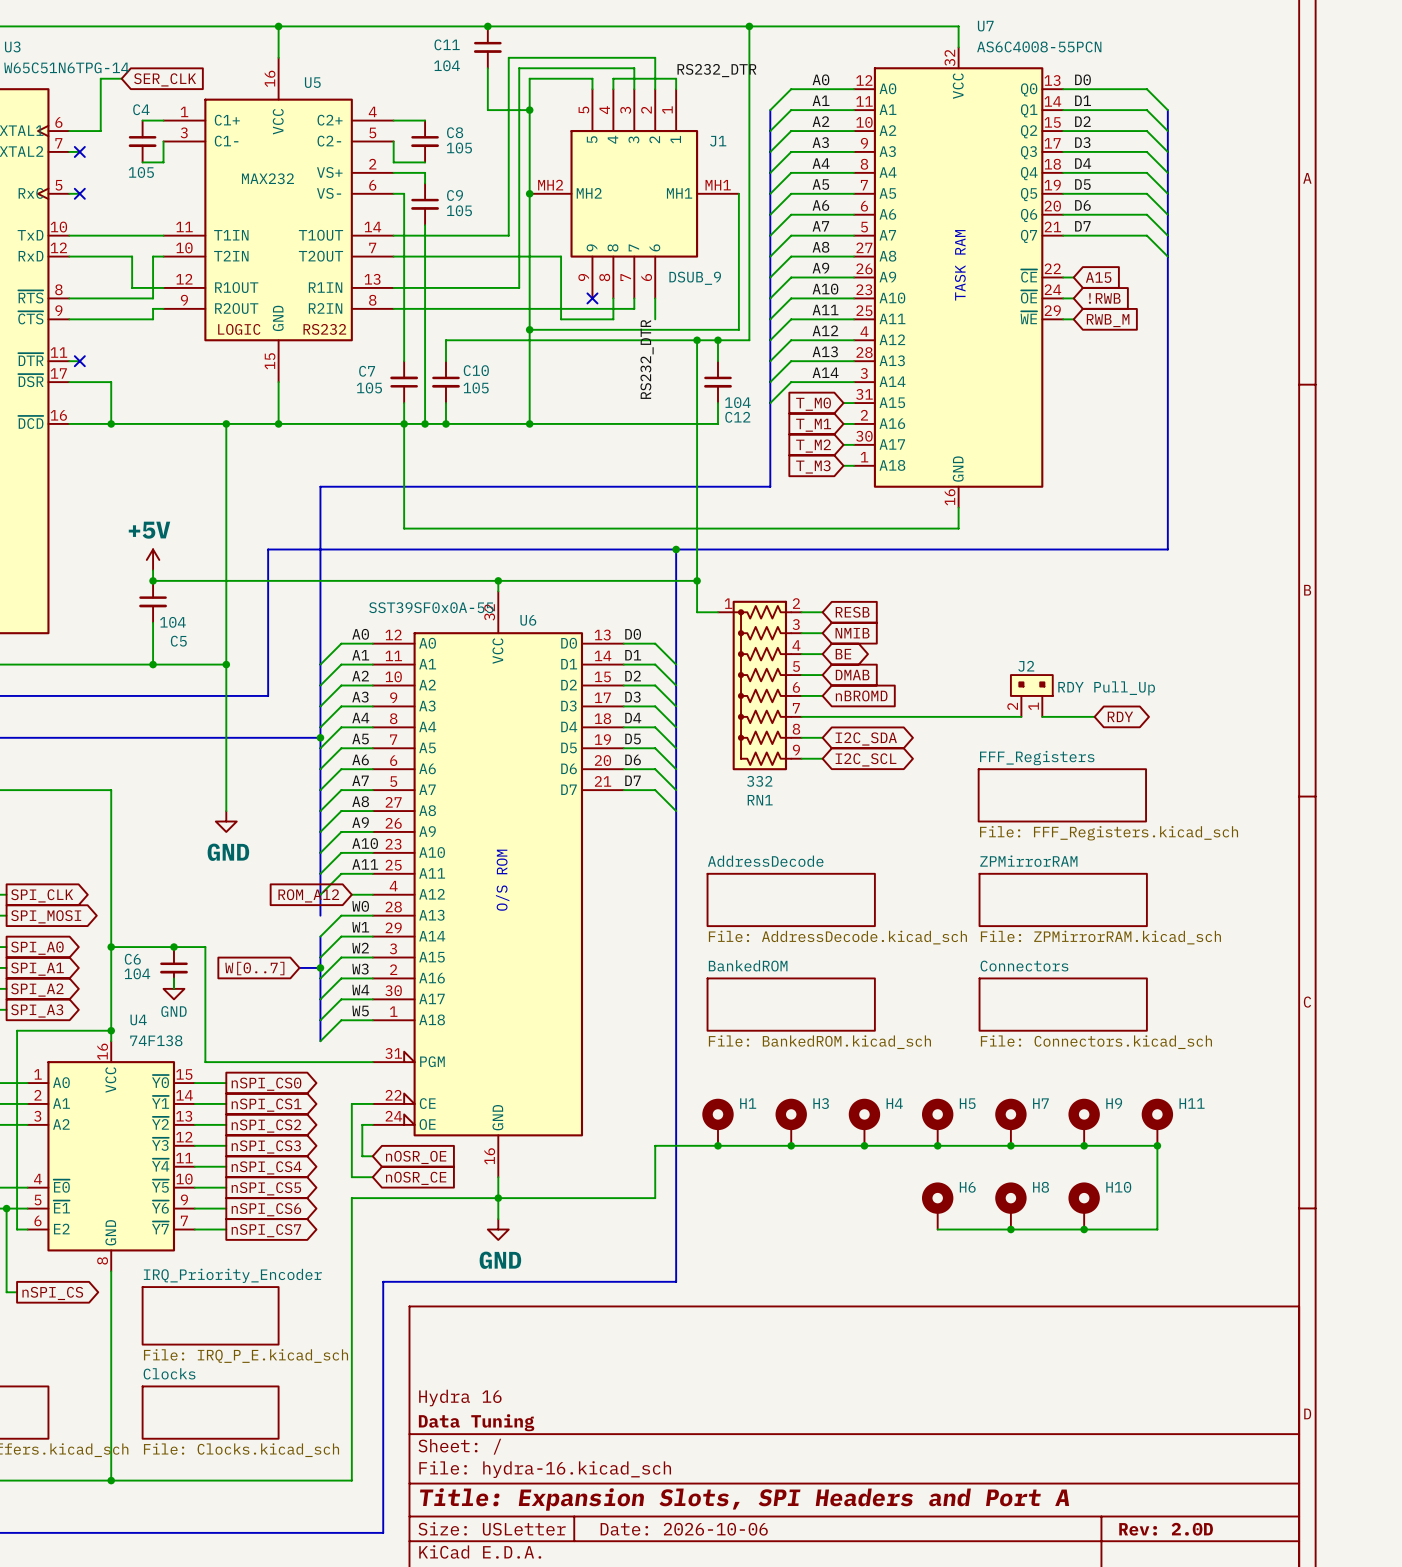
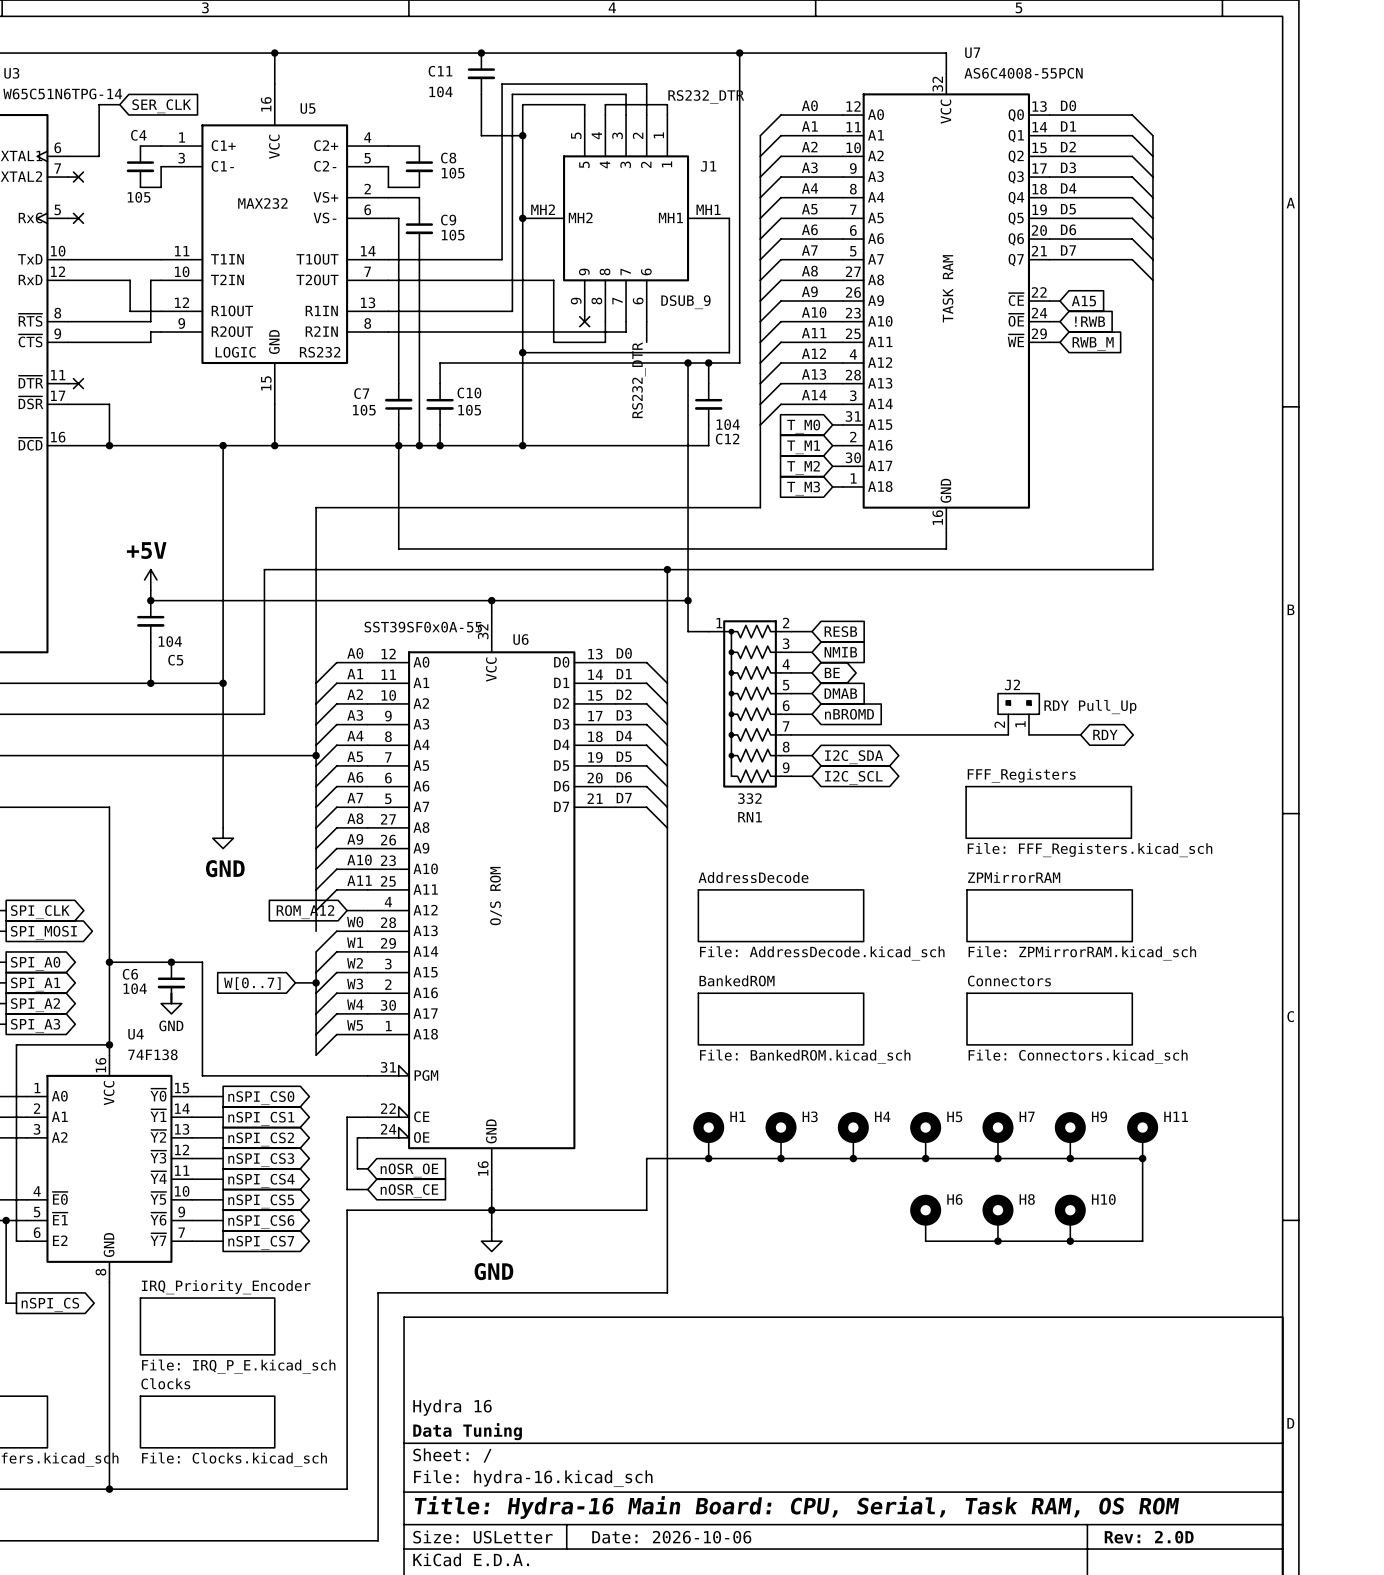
title block: Title: Expansion Slots, SPI Headers and Port A (744, 1499) -> Title: Hydra-16 Main Board: CPU, Serial, Task RAM, OS ROM (796, 1507)

